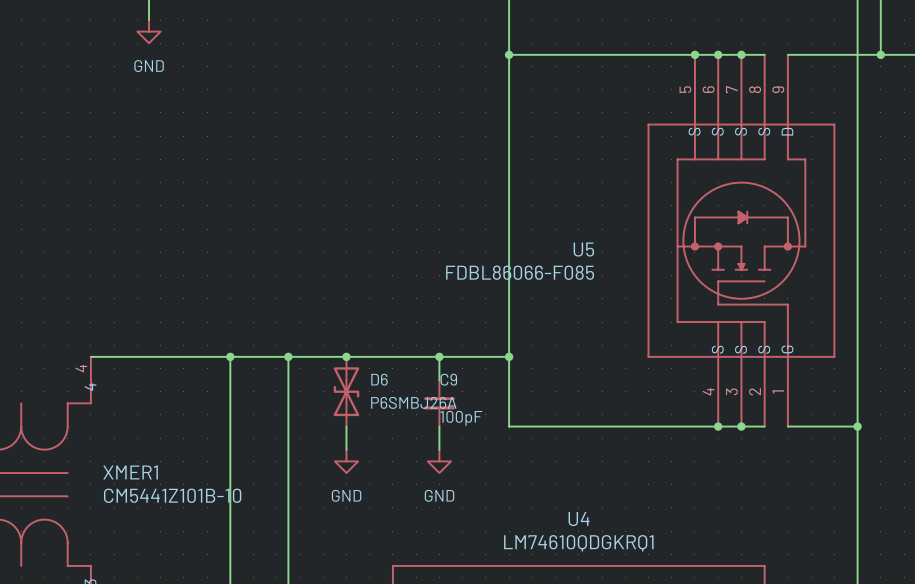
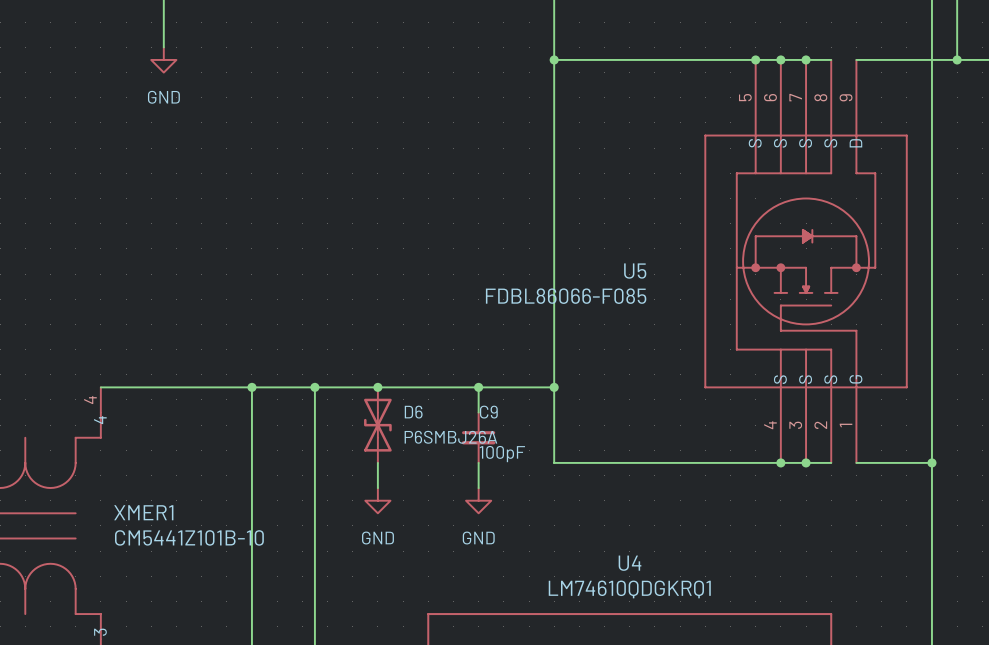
power symbol position: GND (149, 31) -> GND (163, 59)

